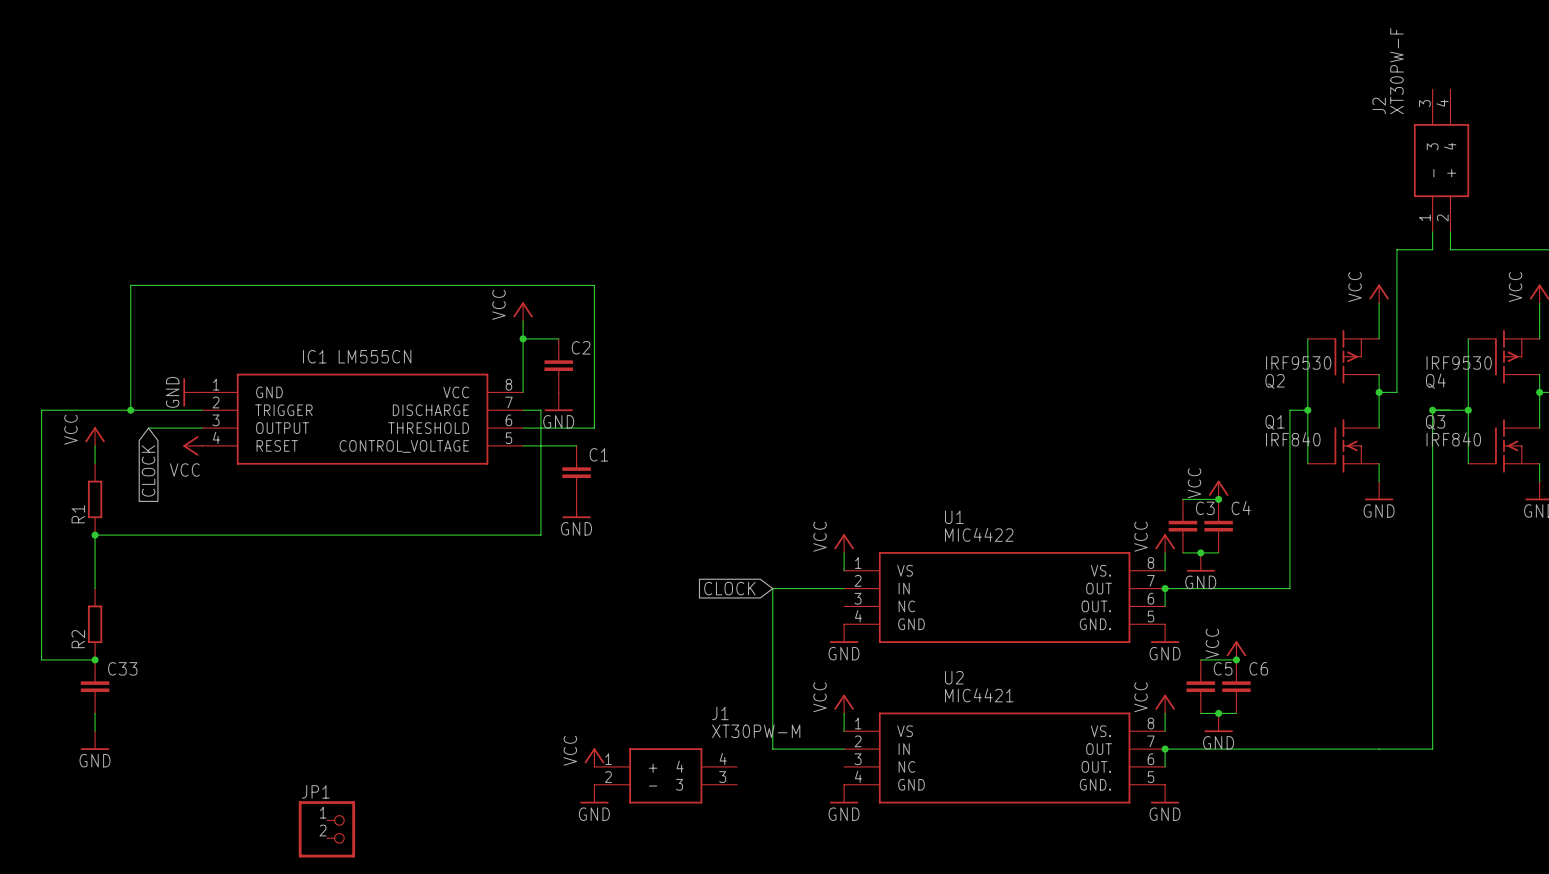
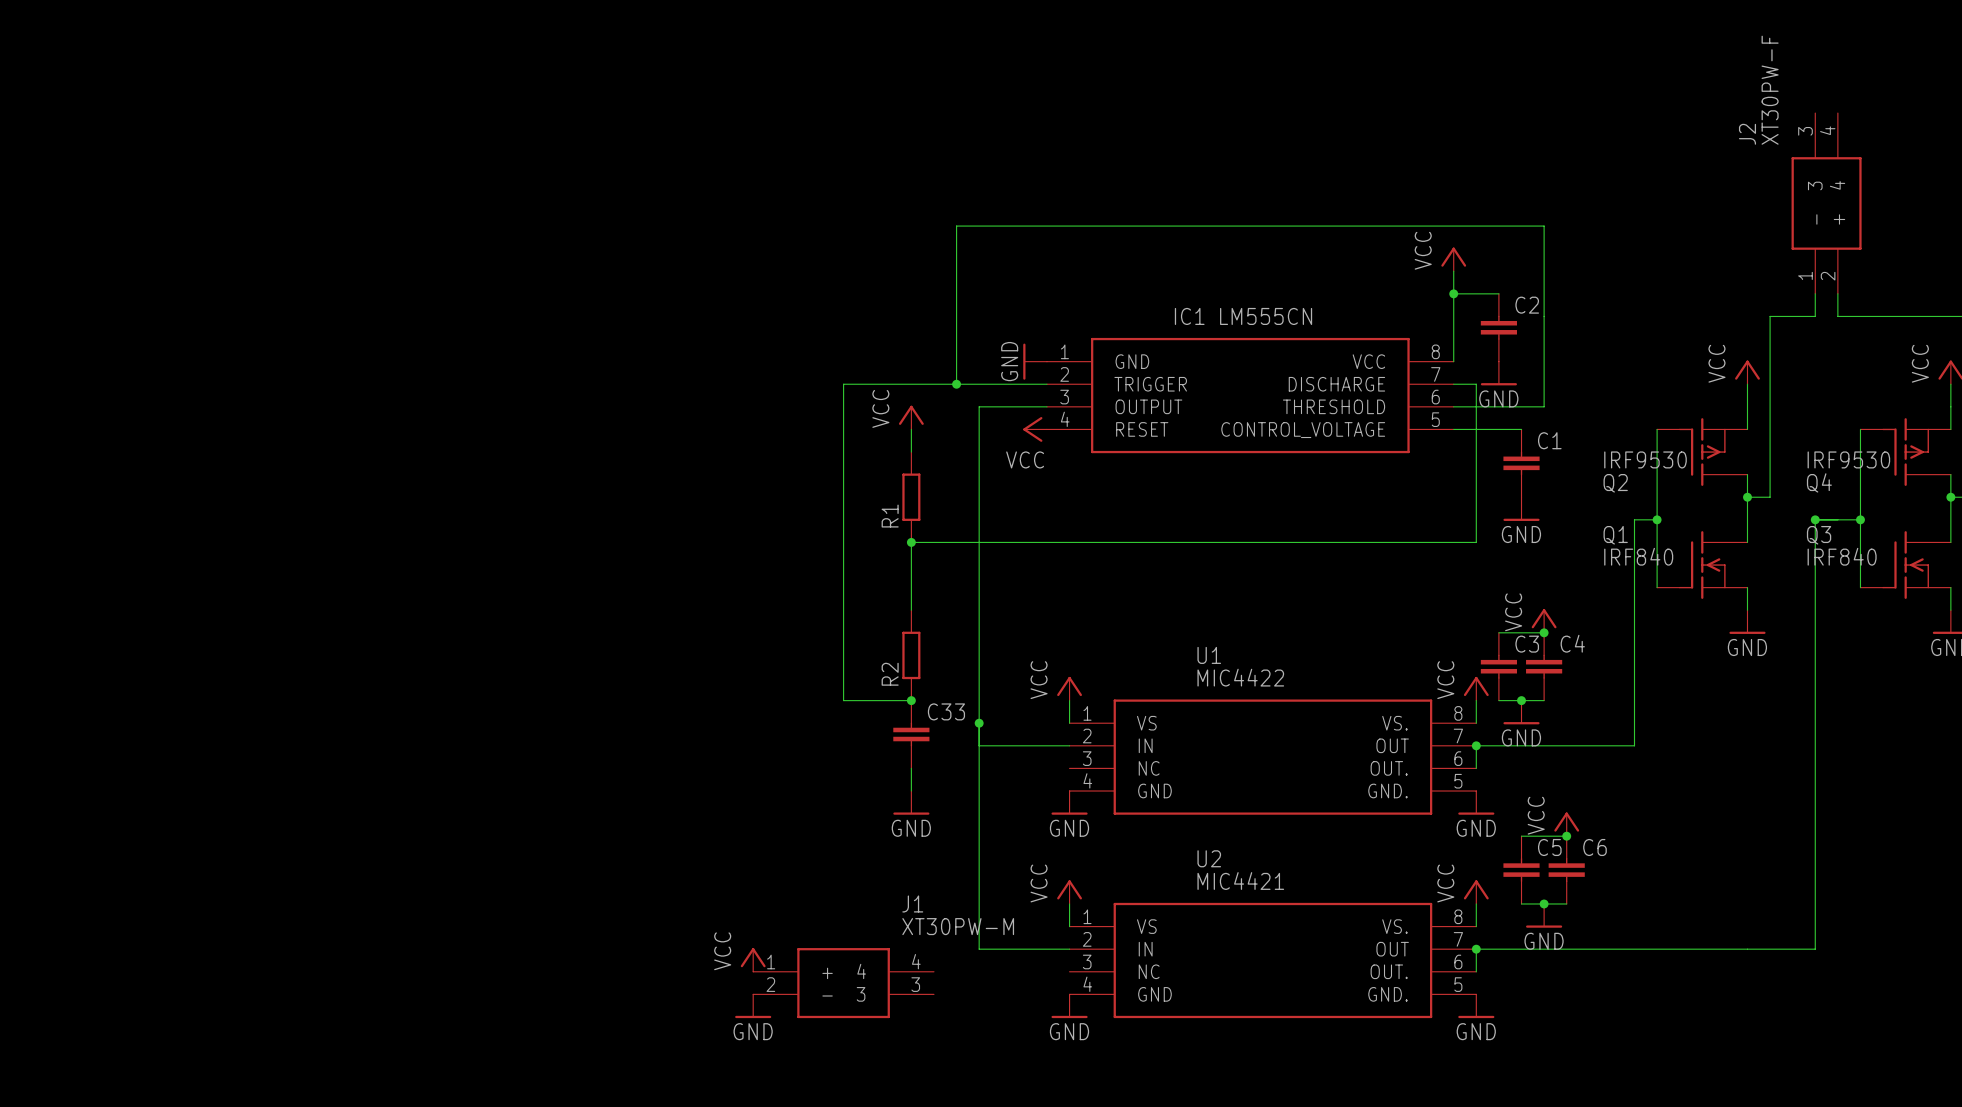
power symbol: none -> VCC (1453, 259)
wire: none -> (1453, 271) (1453, 361)
wire: none -> (1453, 293) (1498, 293)
junction: none -> (1453, 293)
power symbol: none -> GND (1035, 361)
power symbol: none -> GND (1498, 373)
wire: none -> (956, 384) (956, 226) (1544, 226) (1544, 406) (1453, 406)
junction: none -> (956, 384)
wire: none -> (1046, 384) (843, 384) (843, 700) (911, 700)
wire: none -> (1453, 384) (1476, 384) (1476, 542) (911, 542) (911, 610)
power symbol: VCC (523, 311) -> none
wire: (523, 321) (523, 392) -> none
wire: none -> (1046, 406) (979, 406) (979, 745)
power symbol: none -> VCC (911, 417)
wire: (523, 338) (558, 338) -> none
junction: (523, 338) -> none
wire: none -> (911, 429) (911, 452)
power symbol: none -> VCC (1035, 429)
wire: none -> (1453, 429) (1521, 429)
C2 position: (558, 365) -> (1498, 327)
power symbol: GND (192, 392) -> none
power symbol: GND (558, 401) -> none
power symbol: none -> GND (1521, 509)
wire: (130, 410) (130, 285) (594, 285) (594, 428) (523, 428) -> none
junction: (130, 410) -> none
wire: (202, 410) (41, 410) (41, 659) (95, 659) -> none
wire: (523, 410) (540, 410) (540, 535) (95, 535) (95, 588) -> none
IC1 position: (362, 419) -> (1250, 395)
wire: (148, 428) (202, 428) -> none
junction: none -> (911, 542)
power symbol: VCC (95, 436) -> none
wire: (95, 445) (95, 463) -> none
power symbol: VCC (192, 445) -> none
wire: (523, 445) (576, 445) -> none
global label: CLOCK (148, 471) -> none
C1 position: (576, 472) -> (1521, 463)
R1 position: (95, 499) -> (911, 497)
power symbol: GND (576, 508) -> none
junction: (95, 535) -> none
junction: none -> (911, 700)
junction: none -> (979, 723)
global label: CLOCK (729, 588) -> none
wire: none -> (911, 768) (911, 791)
R2 position: (95, 624) -> (911, 655)
power symbol: none -> GND (911, 802)
junction: (95, 659) -> none
C33 position: (95, 686) -> (911, 734)
wire: (95, 713) (95, 731) -> none
power symbol: GND (95, 740) -> none
JP1: (326, 829) -> none

